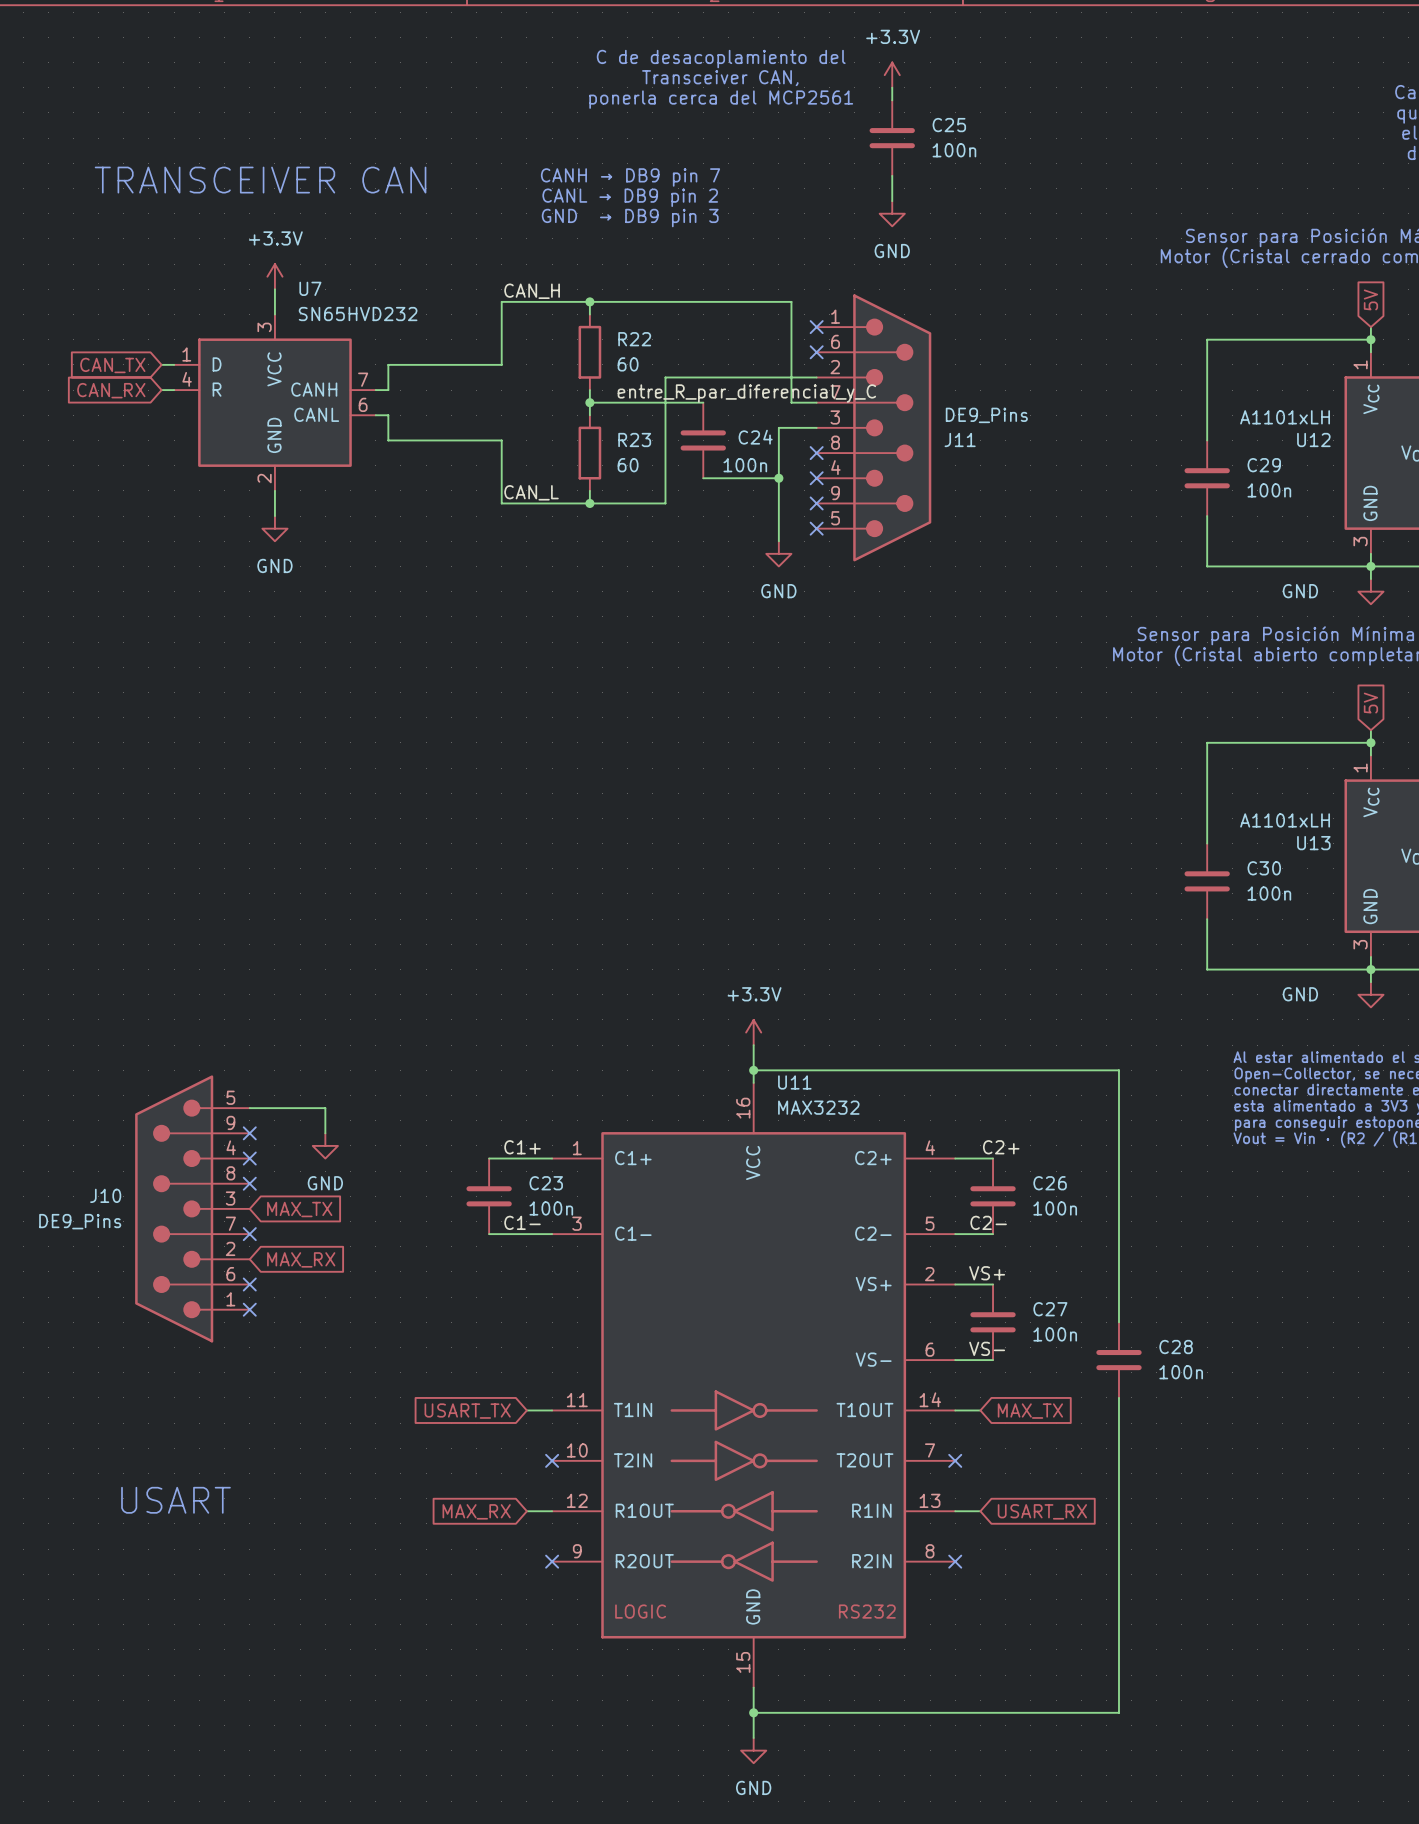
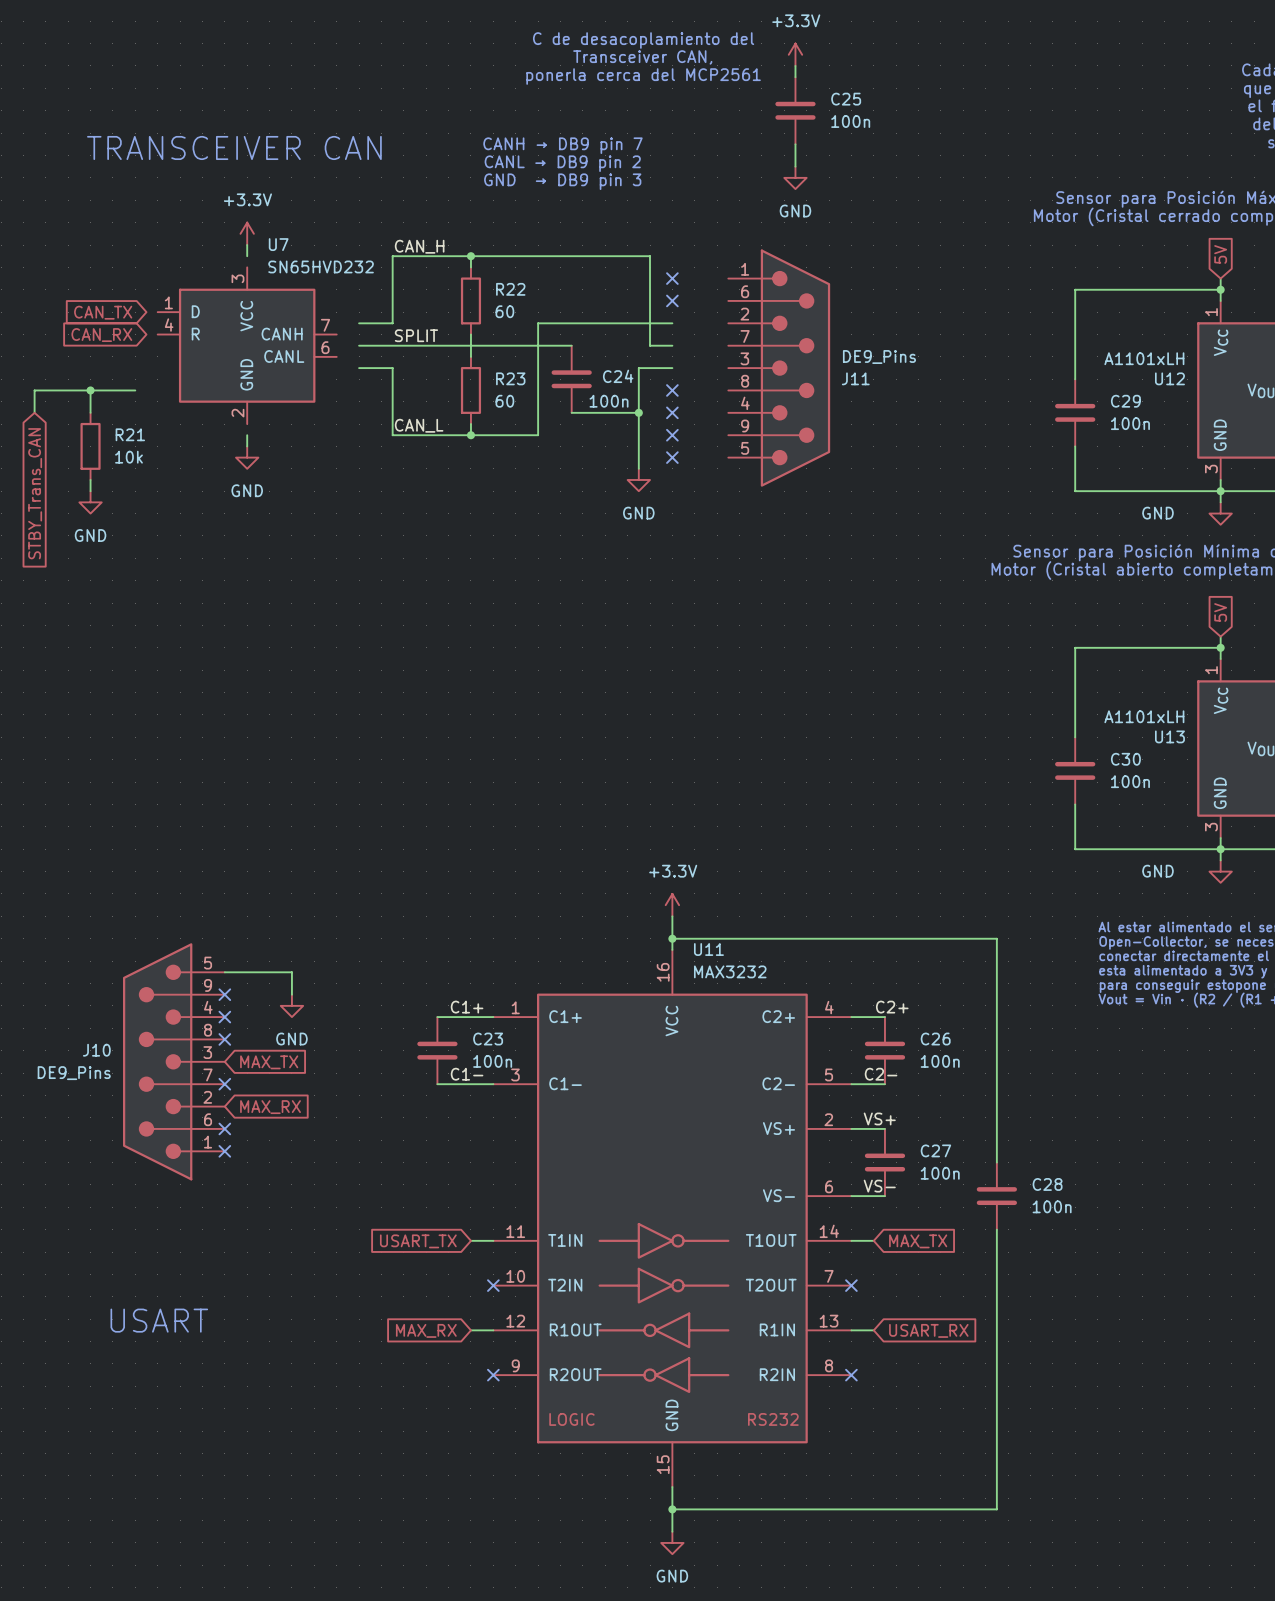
label position: CAN_H (532, 291) -> CAN_H (419, 246)
wire: (274, 301) (274, 314) -> none
wire: (501, 301) (501, 364) (388, 364) (388, 390) (375, 390) -> (448, 256) (392, 256) (392, 323) (359, 323)
junction: none -> (470, 256)
wire: (589, 301) (589, 314) -> (470, 256) (470, 267)
junction: (589, 301) -> none
wire: (728, 301) (791, 301) (791, 402) (816, 402) -> (650, 256) (650, 345) (672, 345)
no-connect mark: none -> (672, 278)
no-connect mark: (816, 327) -> none
R22 position: (589, 352) -> (470, 300)
no-connect mark: none -> (672, 300)
no-connect mark: (816, 352) -> none
wire: (161, 364) (174, 364) -> none
wire: (665, 377) (665, 503) (602, 503) -> (594, 323) (538, 323) (538, 435)
wire: (753, 377) (816, 377) -> none
wire: (161, 390) (174, 390) -> none
wire: (589, 390) (589, 415) -> (470, 334) (470, 356)
label: none -> SPLIT (416, 335)
label: entre_R_par_diferencial_y_C (746, 393) -> none
wire: none -> (359, 345) (526, 345)
junction: (589, 402) -> none
wire: (640, 402) (703, 402) -> (571, 412) (627, 412)
wire: (375, 415) (388, 415) (388, 440) (501, 440) (501, 503) -> (359, 368) (392, 368) (392, 435) (448, 435)
wire: (816, 427) (778, 427) (778, 541) -> (672, 368) (638, 368) (638, 468)
C24 position: (703, 440) -> (571, 379)
wire: none -> (90, 390) (90, 412)
junction: none -> (90, 390)
wire: none -> (135, 390) (34, 390) (34, 412)
R23 position: (589, 453) -> (470, 390)
no-connect mark: none -> (672, 390)
no-connect mark: (816, 453) -> none
wire: (715, 478) (778, 478) -> none
junction: none -> (638, 412)
no-connect mark: none -> (672, 412)
junction: (778, 478) -> none
no-connect mark: (816, 478) -> none
wire: (274, 490) (274, 503) -> (90, 479) (90, 491)
wire: (589, 490) (589, 503) -> (470, 424) (470, 435)
label position: CAN_L (531, 492) -> CAN_L (419, 425)
junction: none -> (470, 435)
junction: (589, 503) -> none
no-connect mark: none -> (672, 435)
no-connect mark: (816, 503) -> none
R21: none -> 10k (90, 446)
no-connect mark: none -> (672, 457)
no-connect mark: (816, 528) -> none
power symbol position: GND (778, 553) -> GND (638, 479)
global label: none -> STBY_Trans_CAN (35, 493)
power symbol: none -> GND (90, 502)

